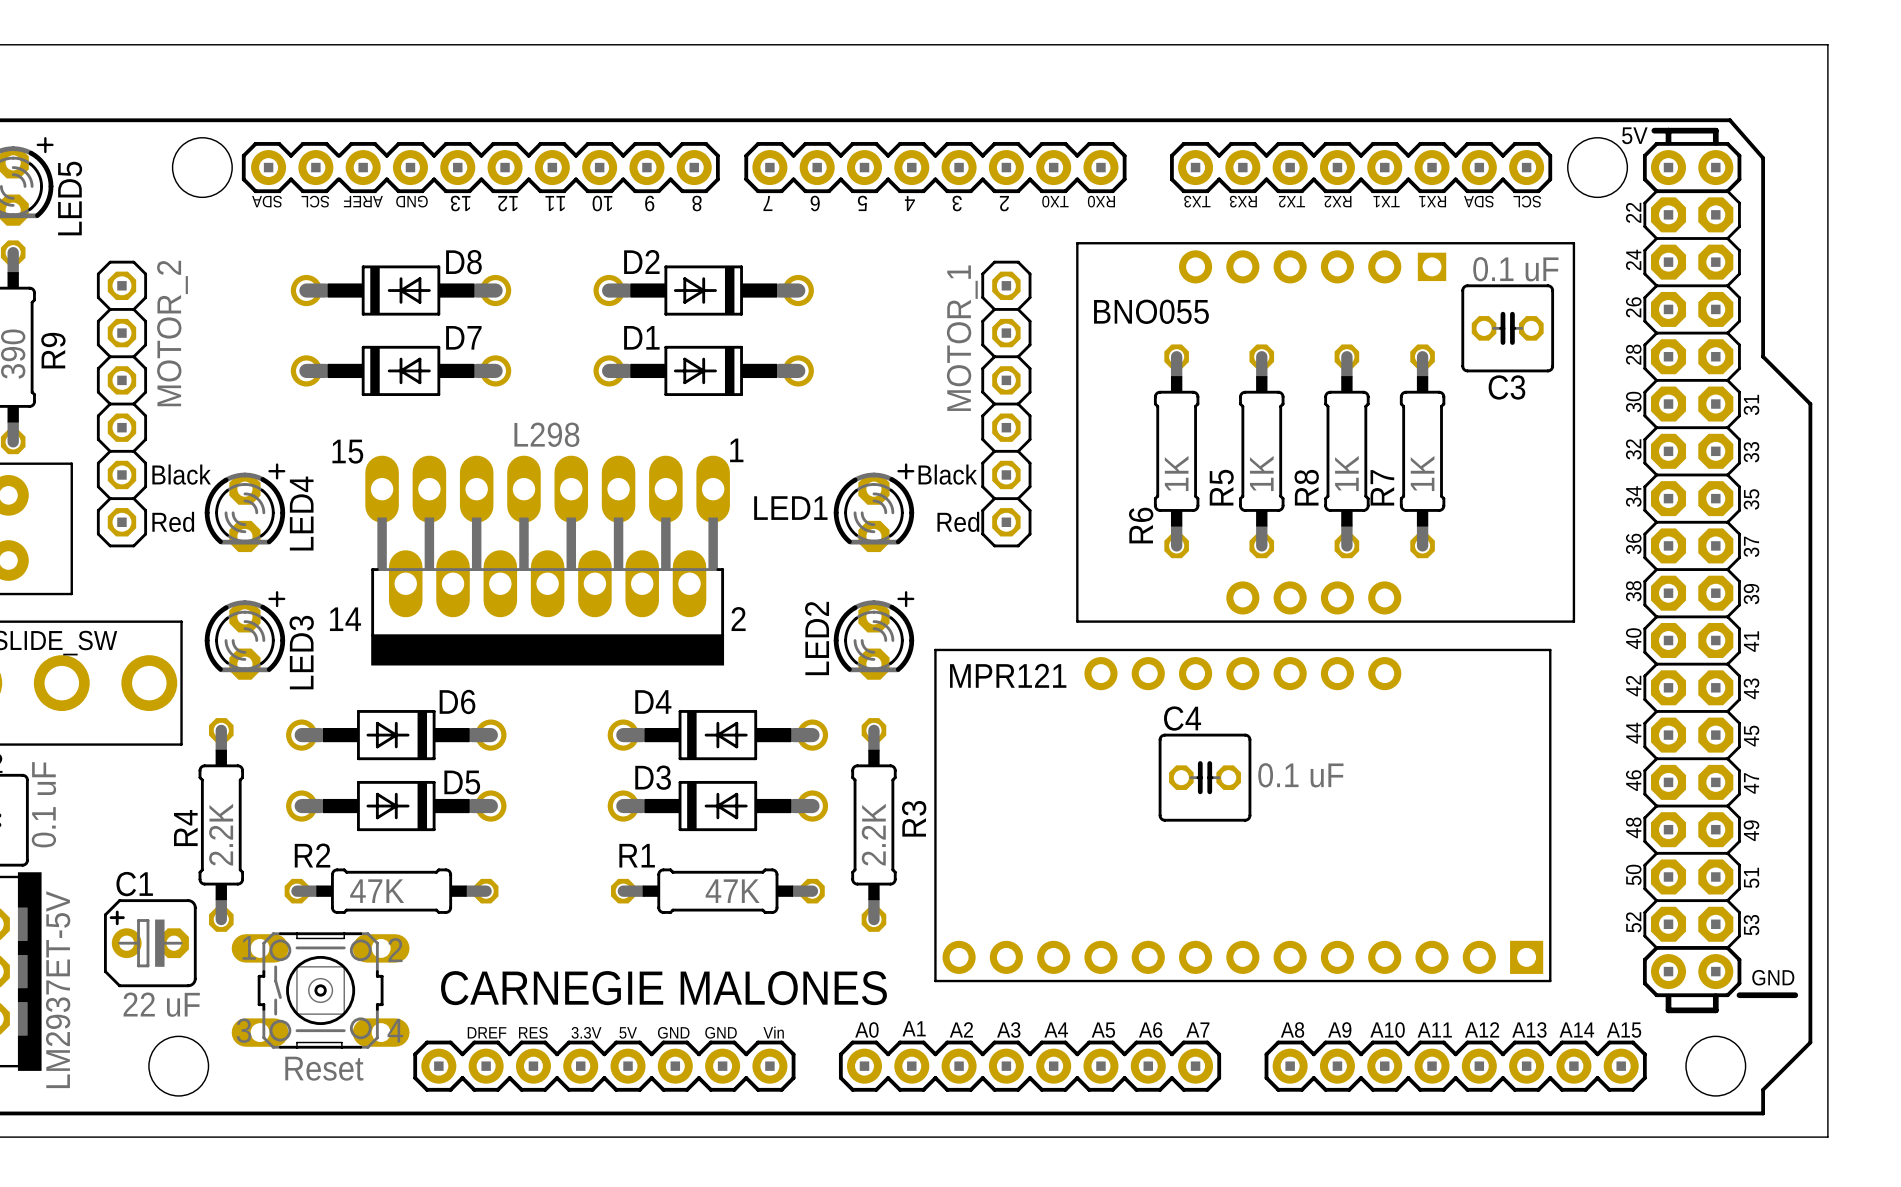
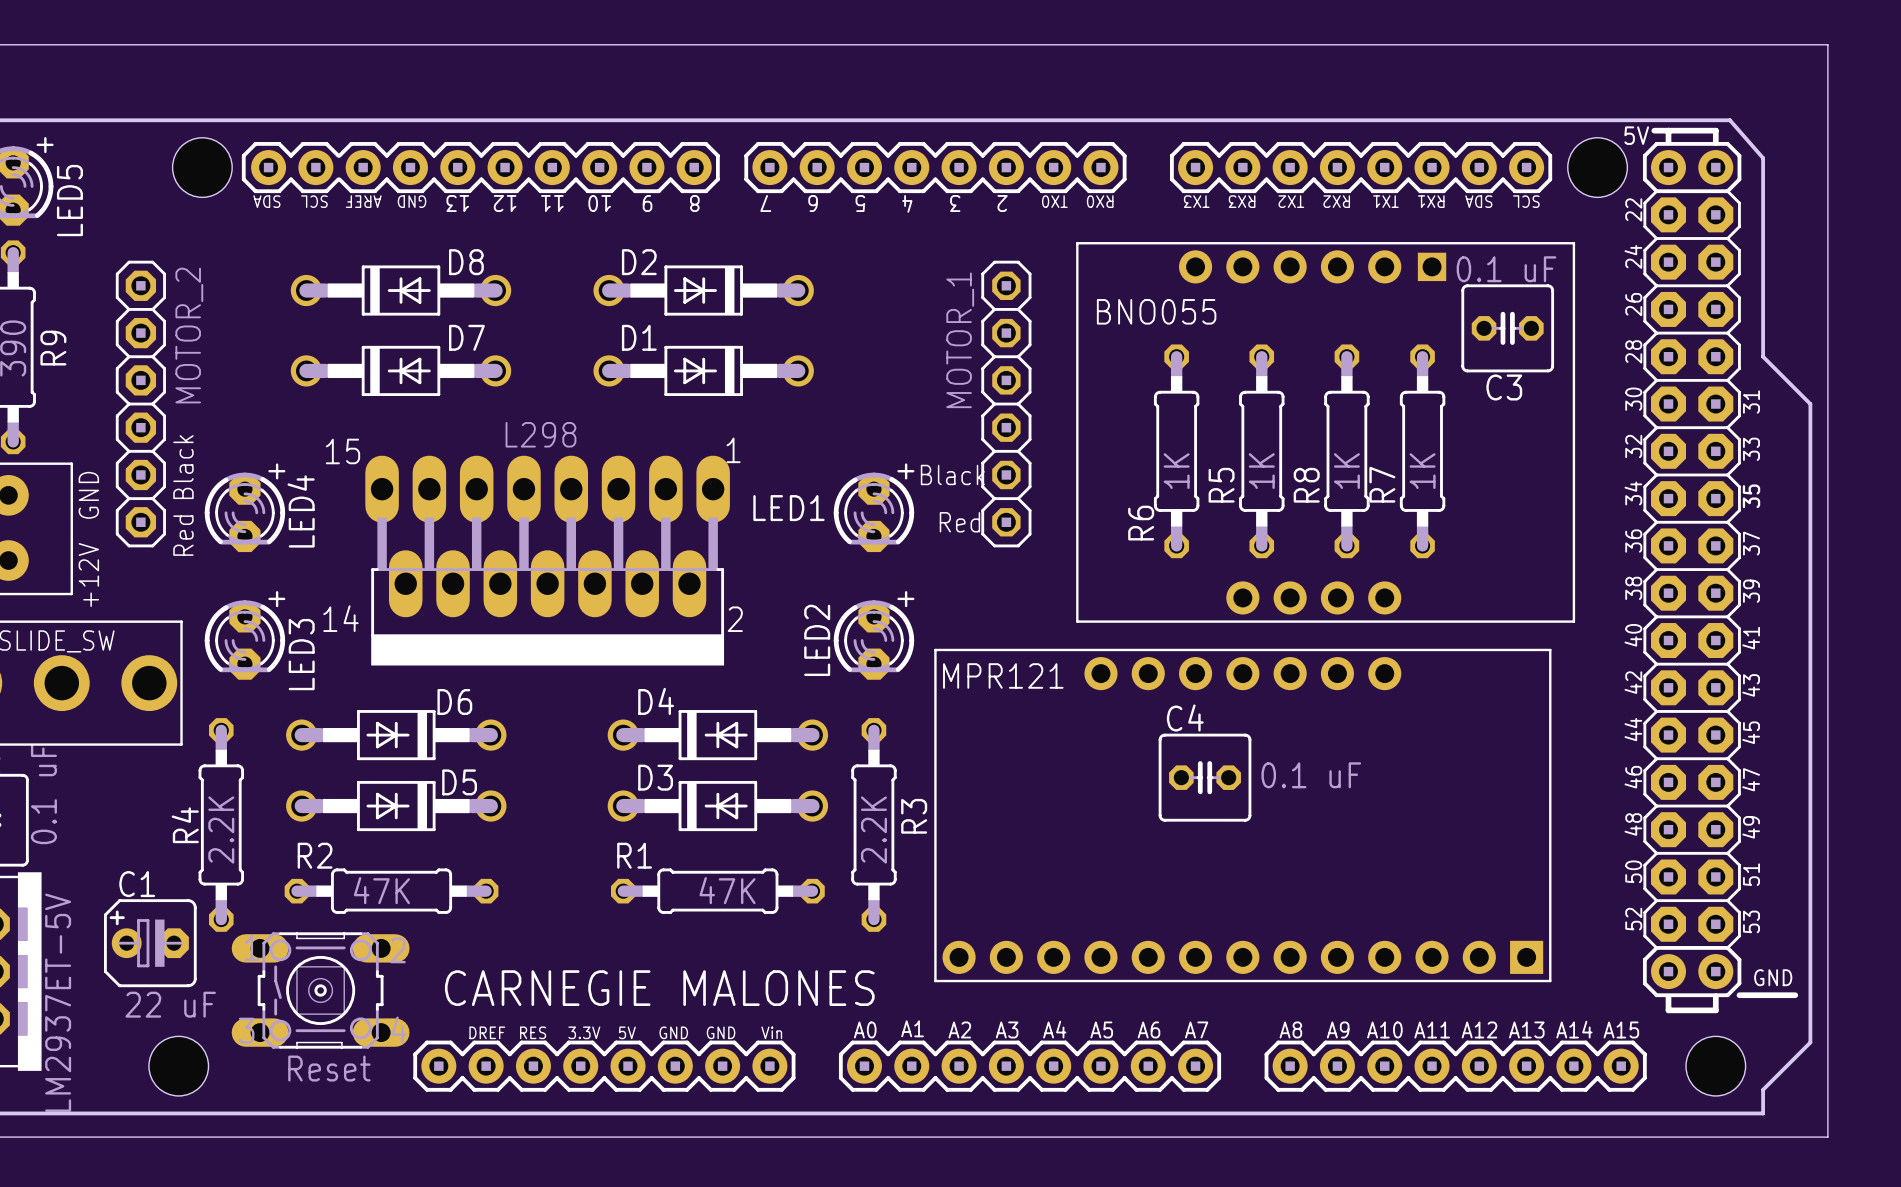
part: MOTOR_2 (121, 404) -> none
part: none -> MOTOR_2 (140, 404)
text rotation: 0° (181, 474) -> 90° counterclockwise (183, 467)
text: none -> GND (88, 495)
text rotation: 0° (173, 521) -> 90° counterclockwise (183, 535)
text: none -> +12V (88, 575)

